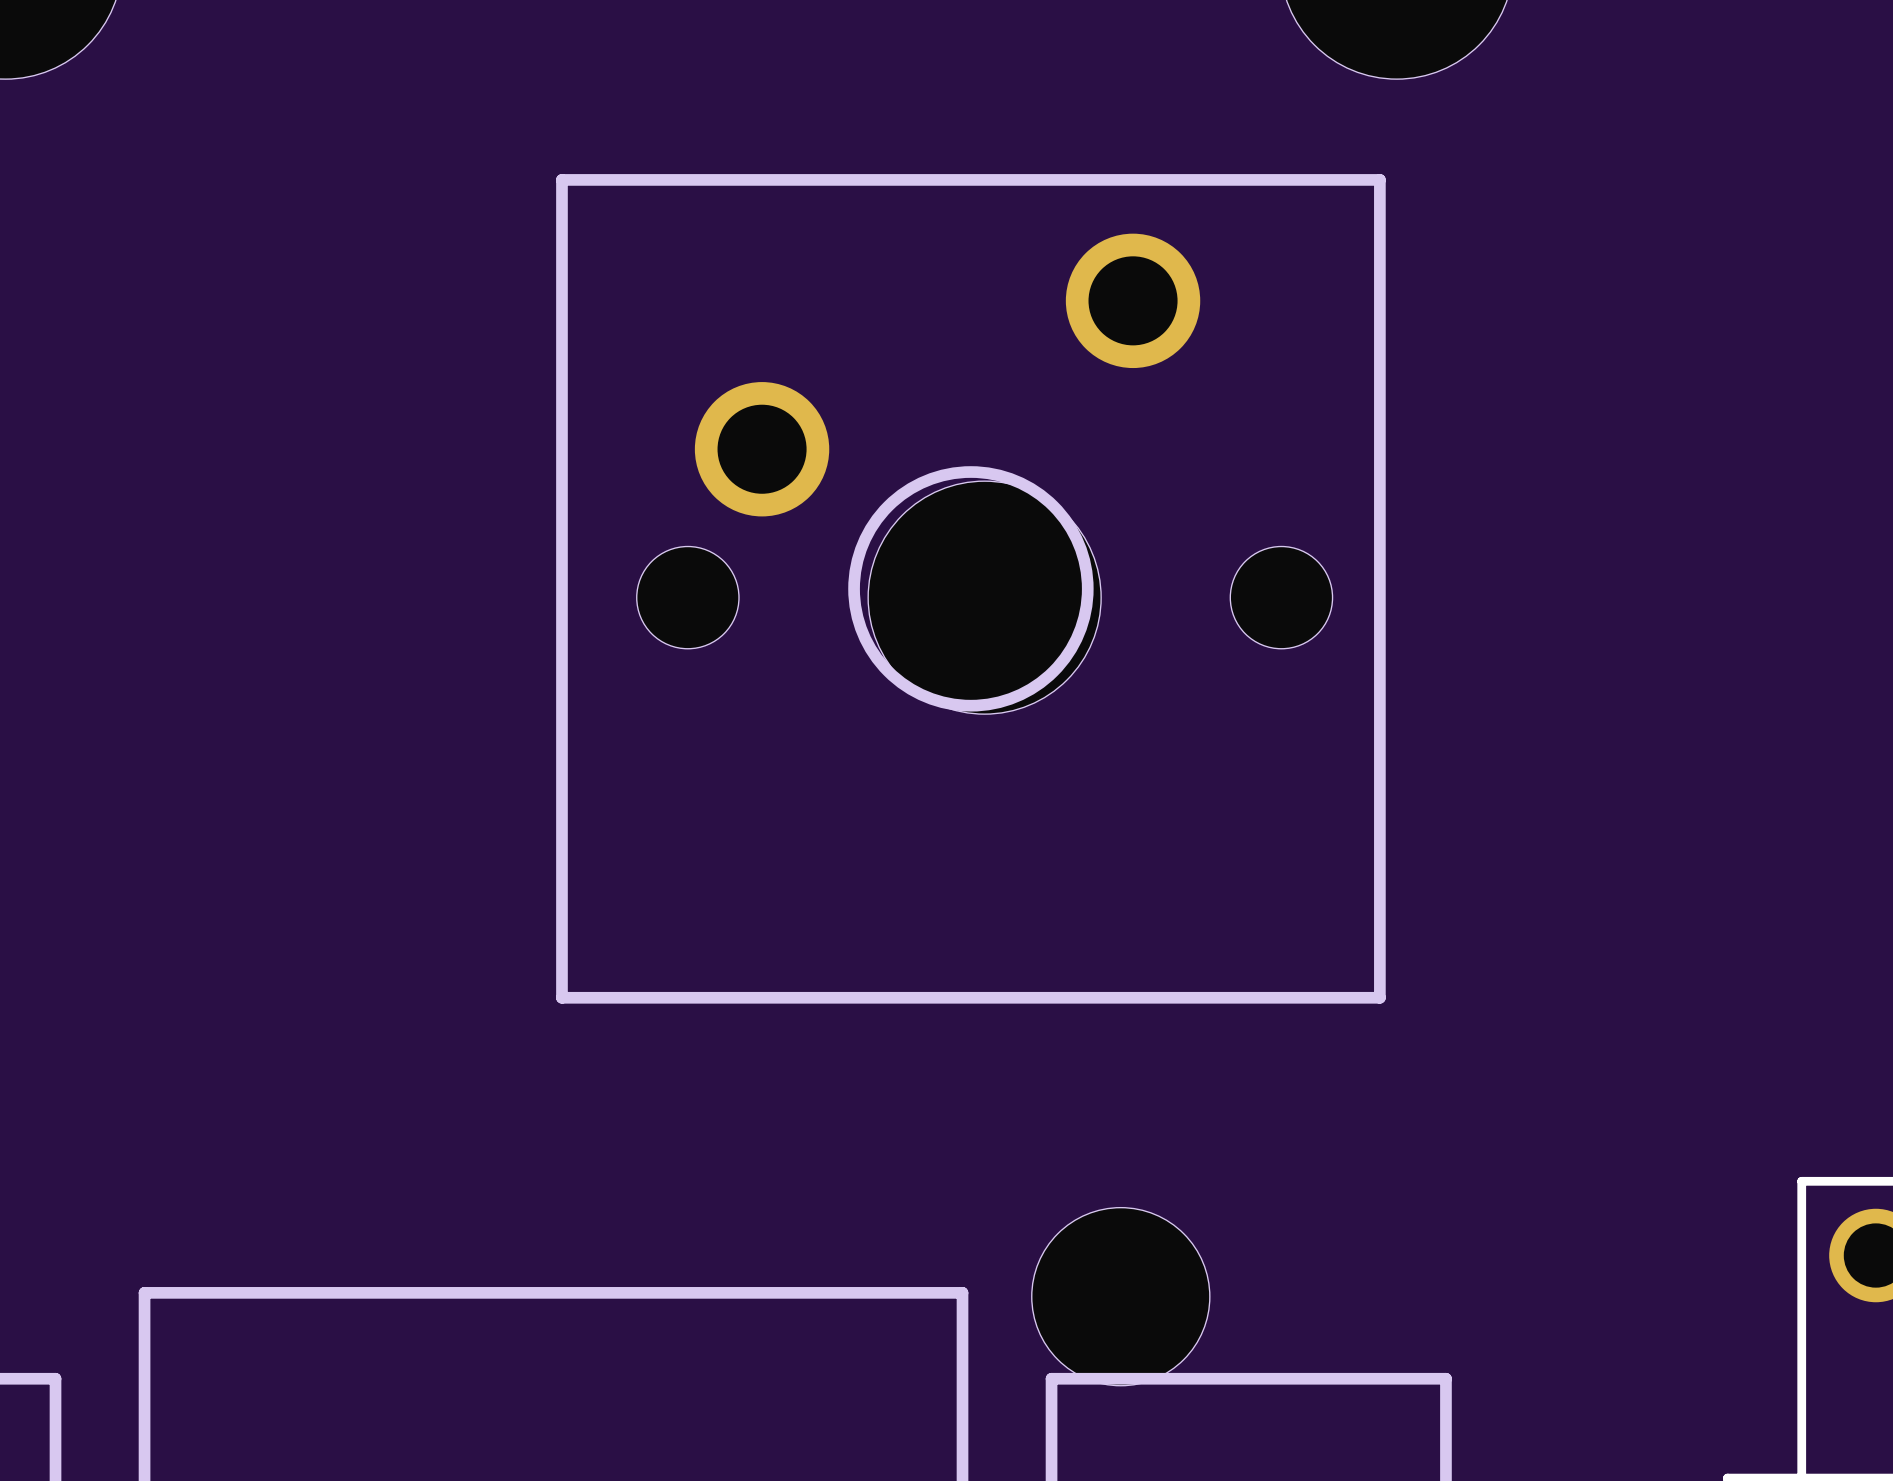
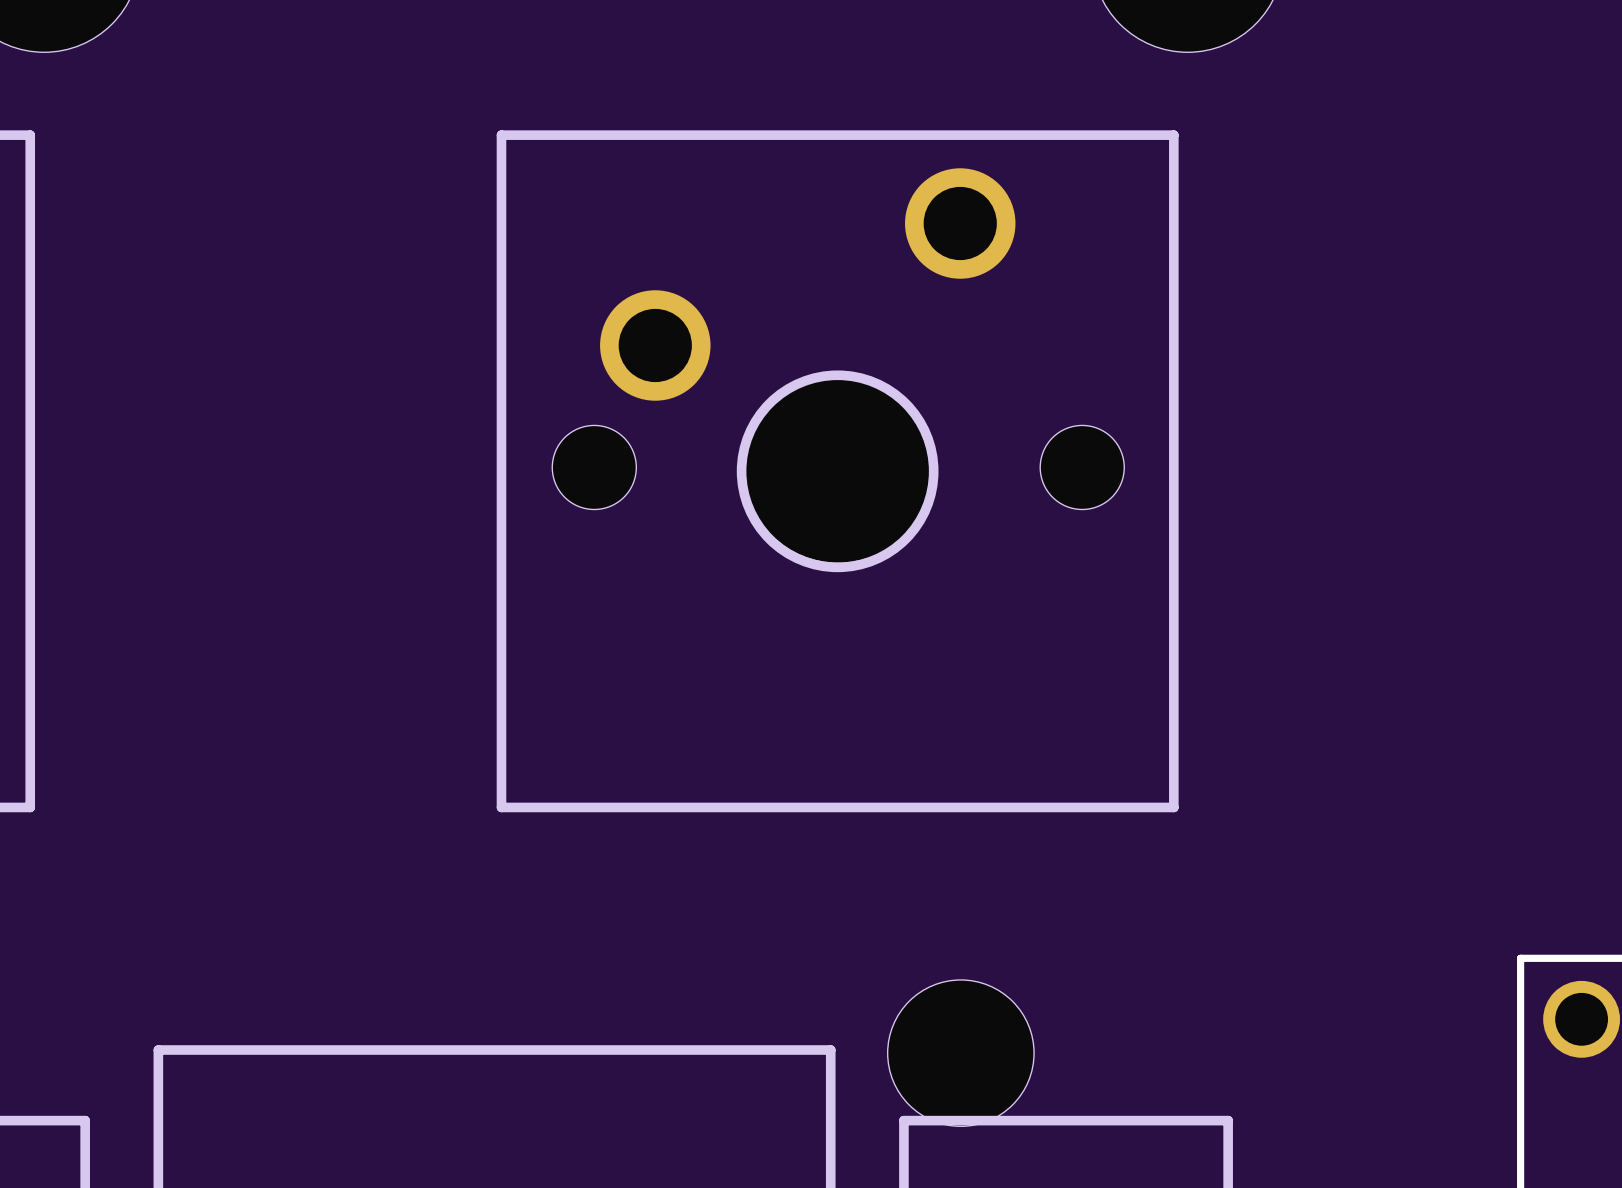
part position: (984, 473) -> (838, 365)

